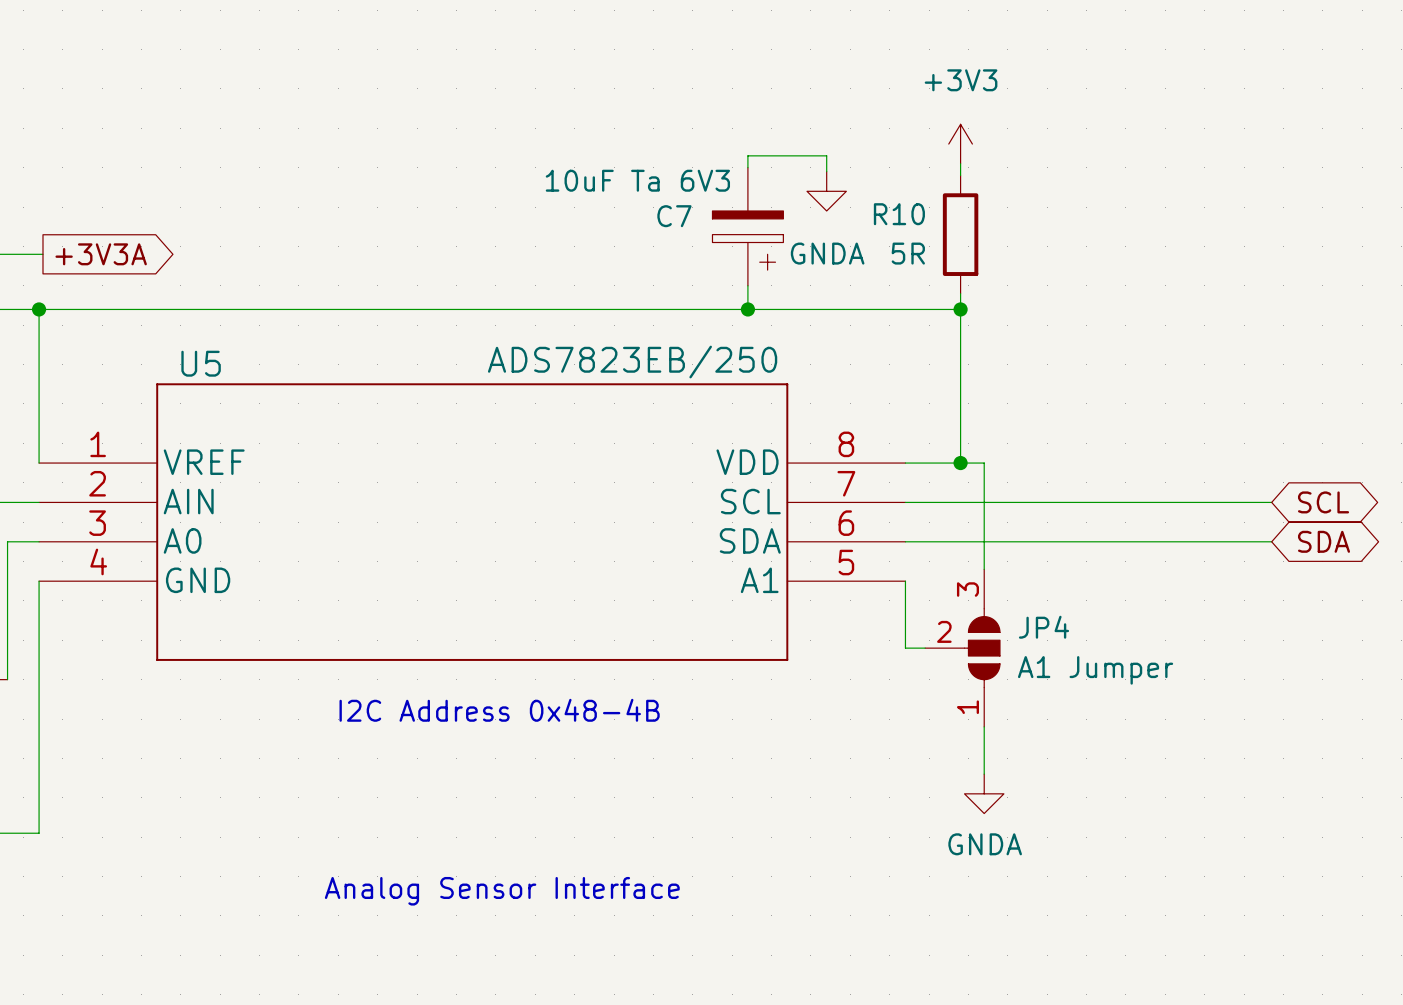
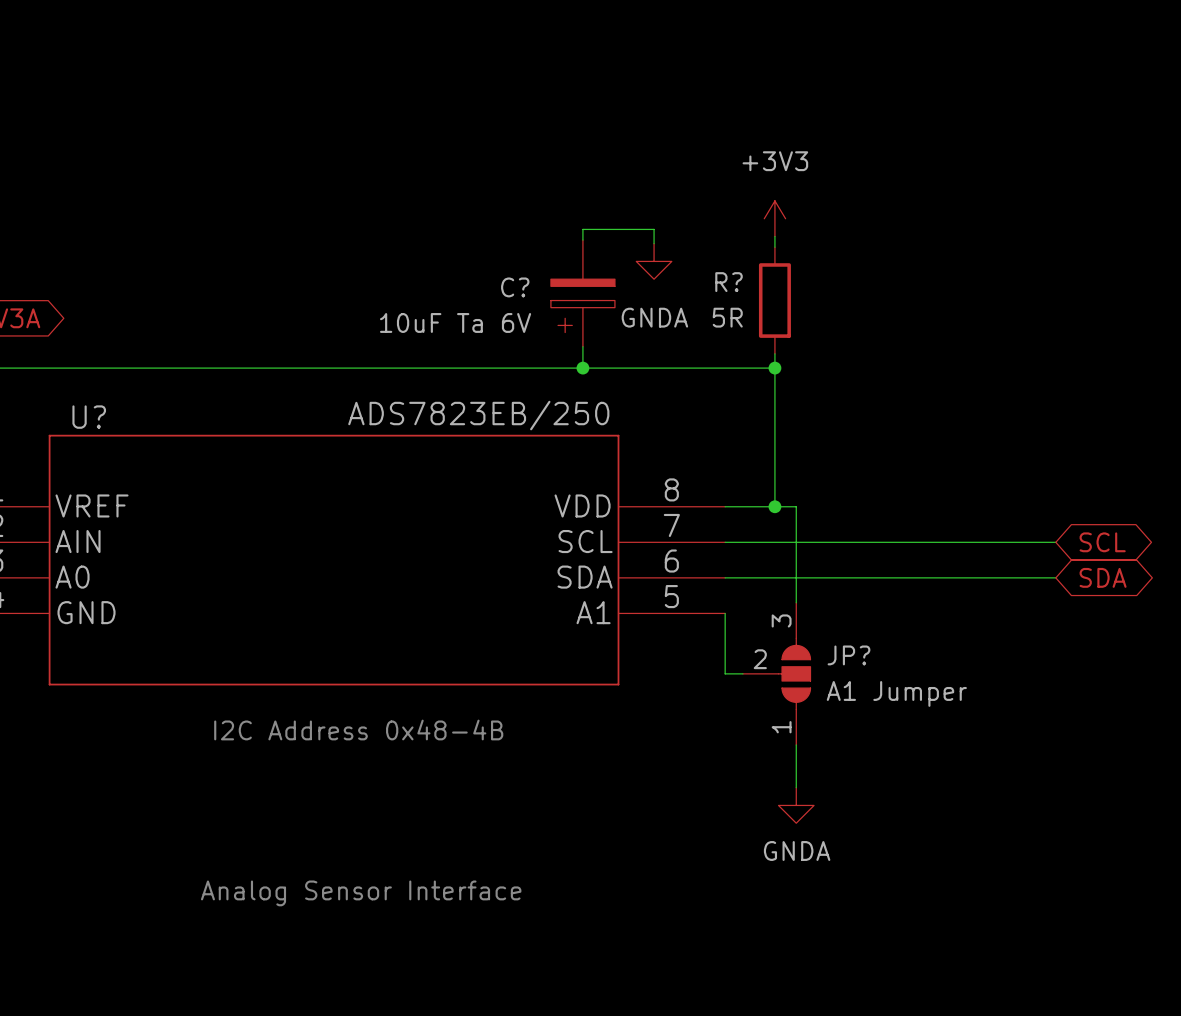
R10 name: R10 (899, 214) -> R? (729, 282)
C7: 10uF Ta 6V3 (747, 226) -> none
C?: none -> 10uF Ta 6V (582, 293)
U5 name: U5 (201, 363) -> U? (89, 417)
JP4 name: JP4 (1044, 627) -> JP? (848, 655)

